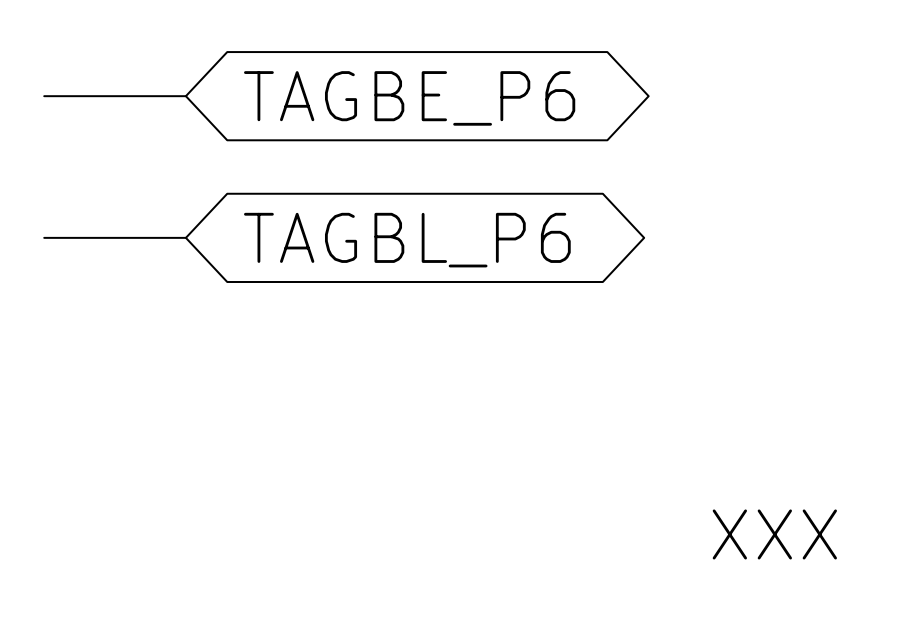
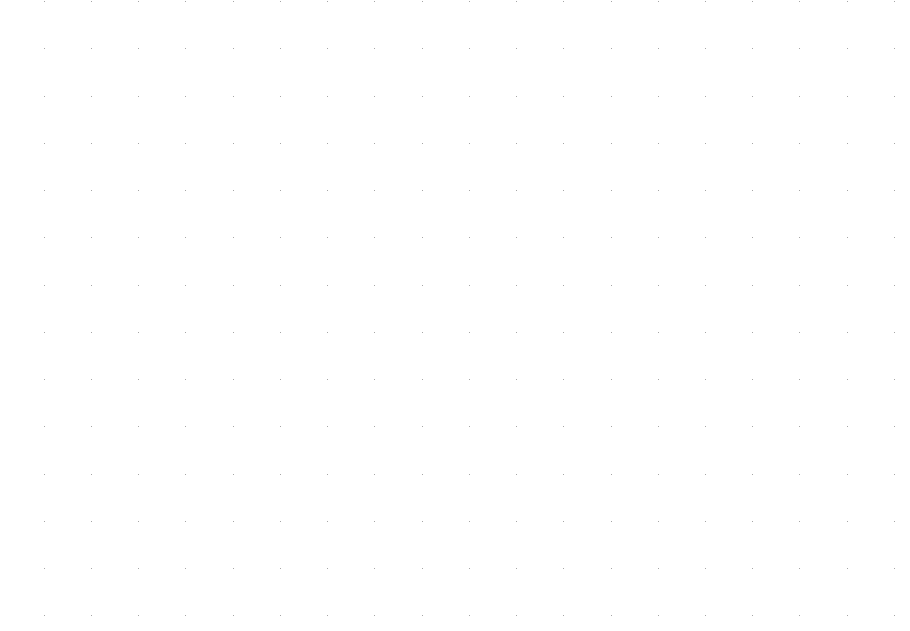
wire: (44, 96) (185, 96) -> none
global label: TAGBE_P6 (409, 98) -> none
wire: (44, 237) (185, 237) -> none
global label: TAGBL_P6 (407, 240) -> none
text: XXX (774, 534) -> none

